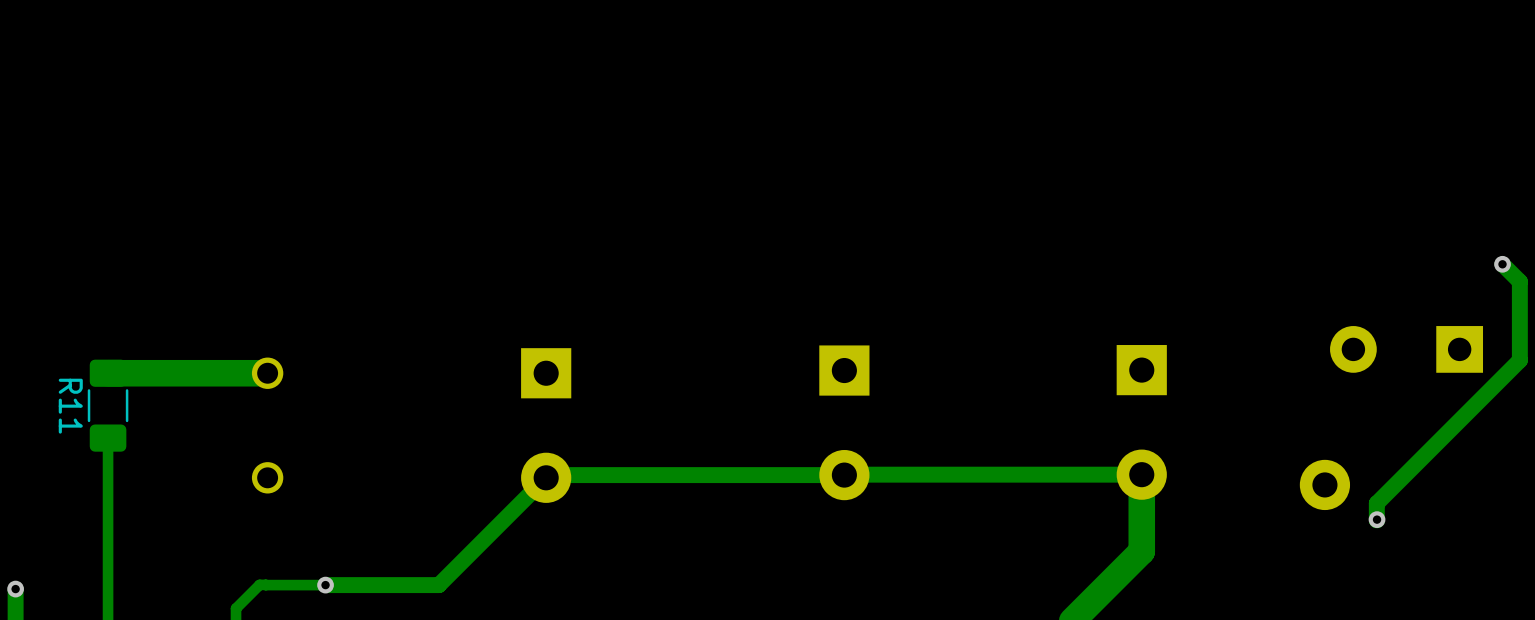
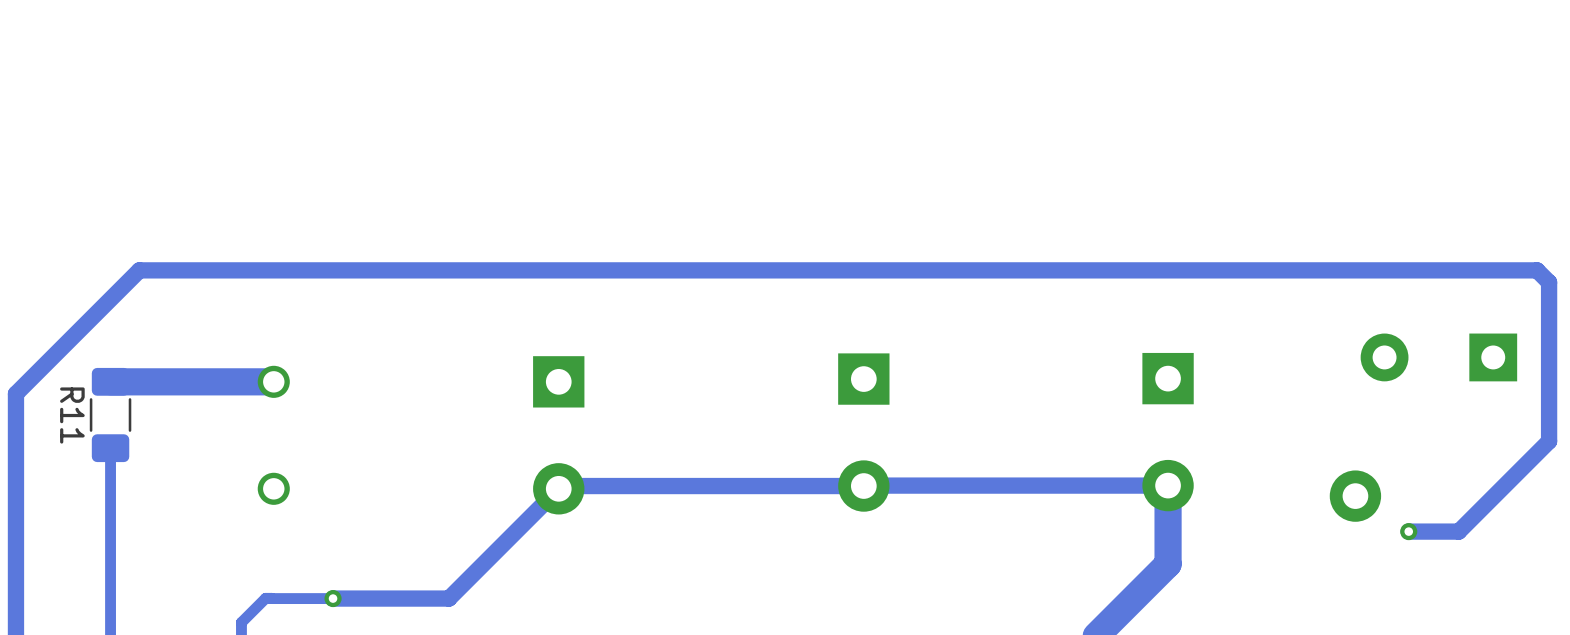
track: none -> (1537, 270) (139, 270) (15, 393) (15, 602)
via: (1502, 264) -> none
track: (1514, 276) (1519, 281) (1519, 360) (1376, 503) (1376, 520) -> (1549, 282) (1549, 441) (1458, 531) (1408, 531)
via: (15, 589) -> none

